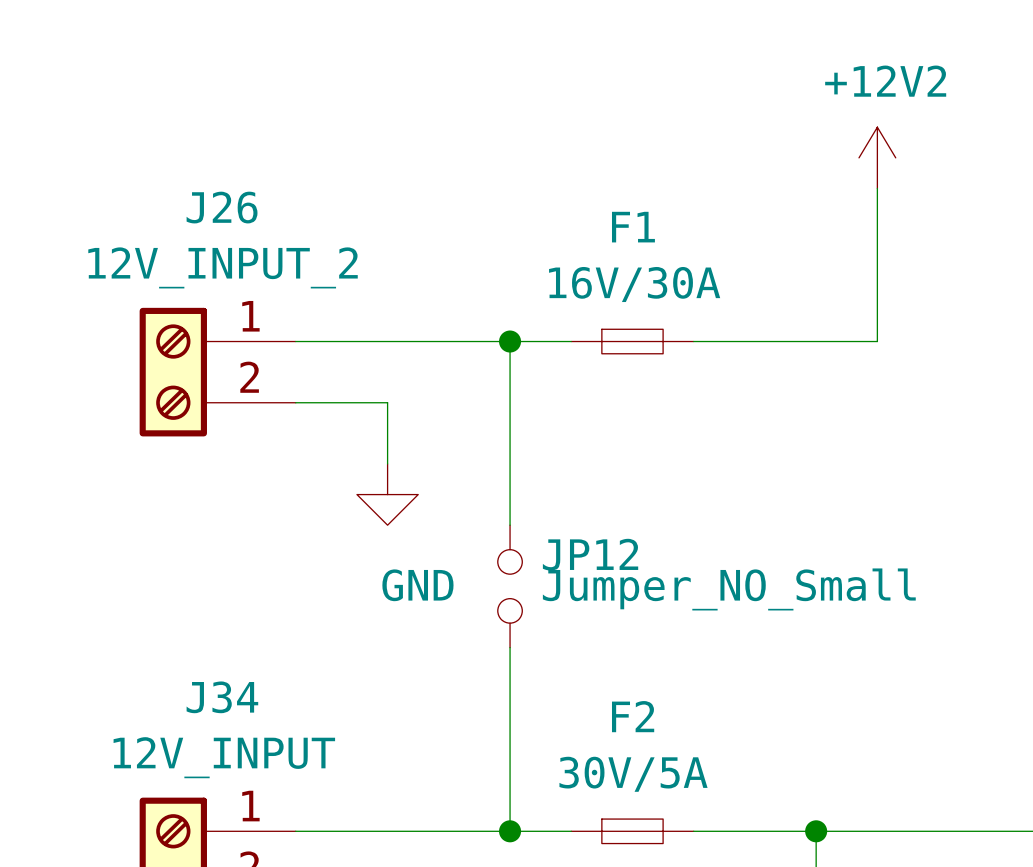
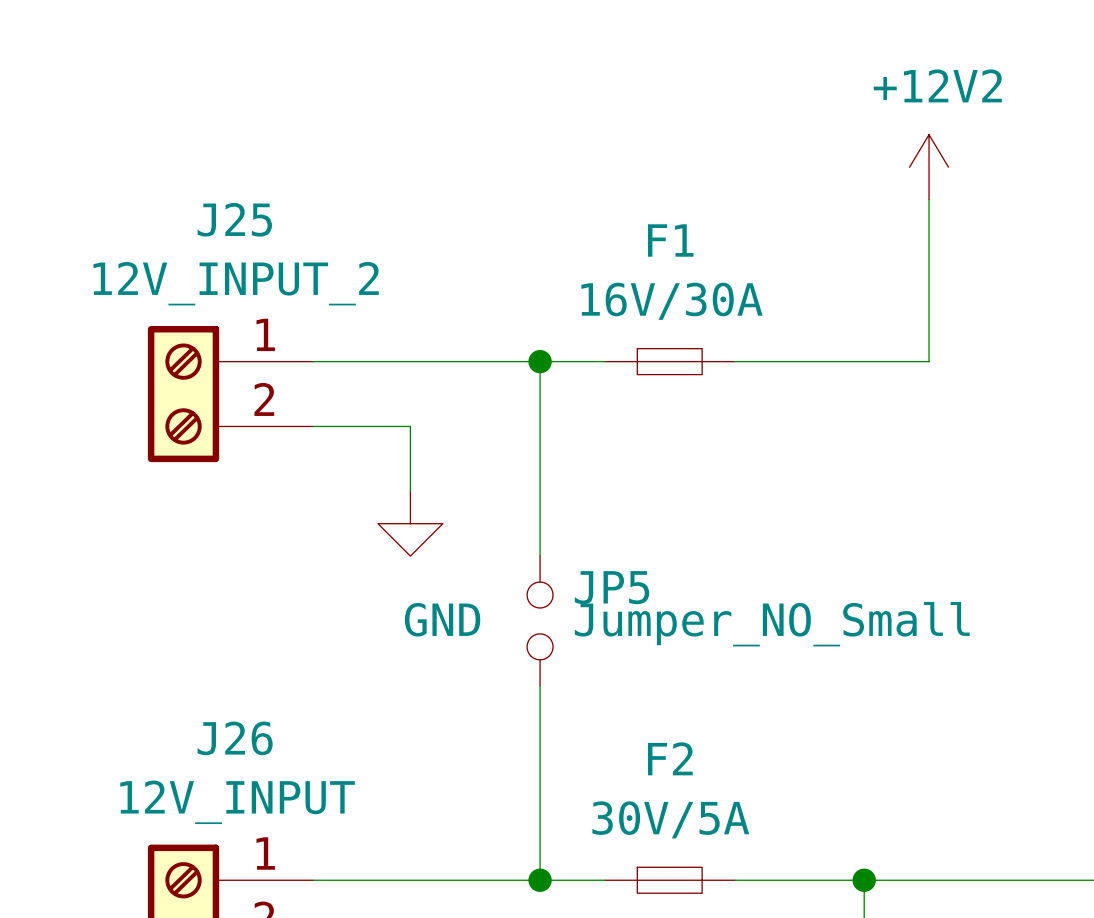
J26 name: J26 (222, 207) -> J25 (234, 219)
JP12 name: JP12 (590, 554) -> JP5 (612, 587)
J34 name: J34 (222, 697) -> J26 (235, 738)

